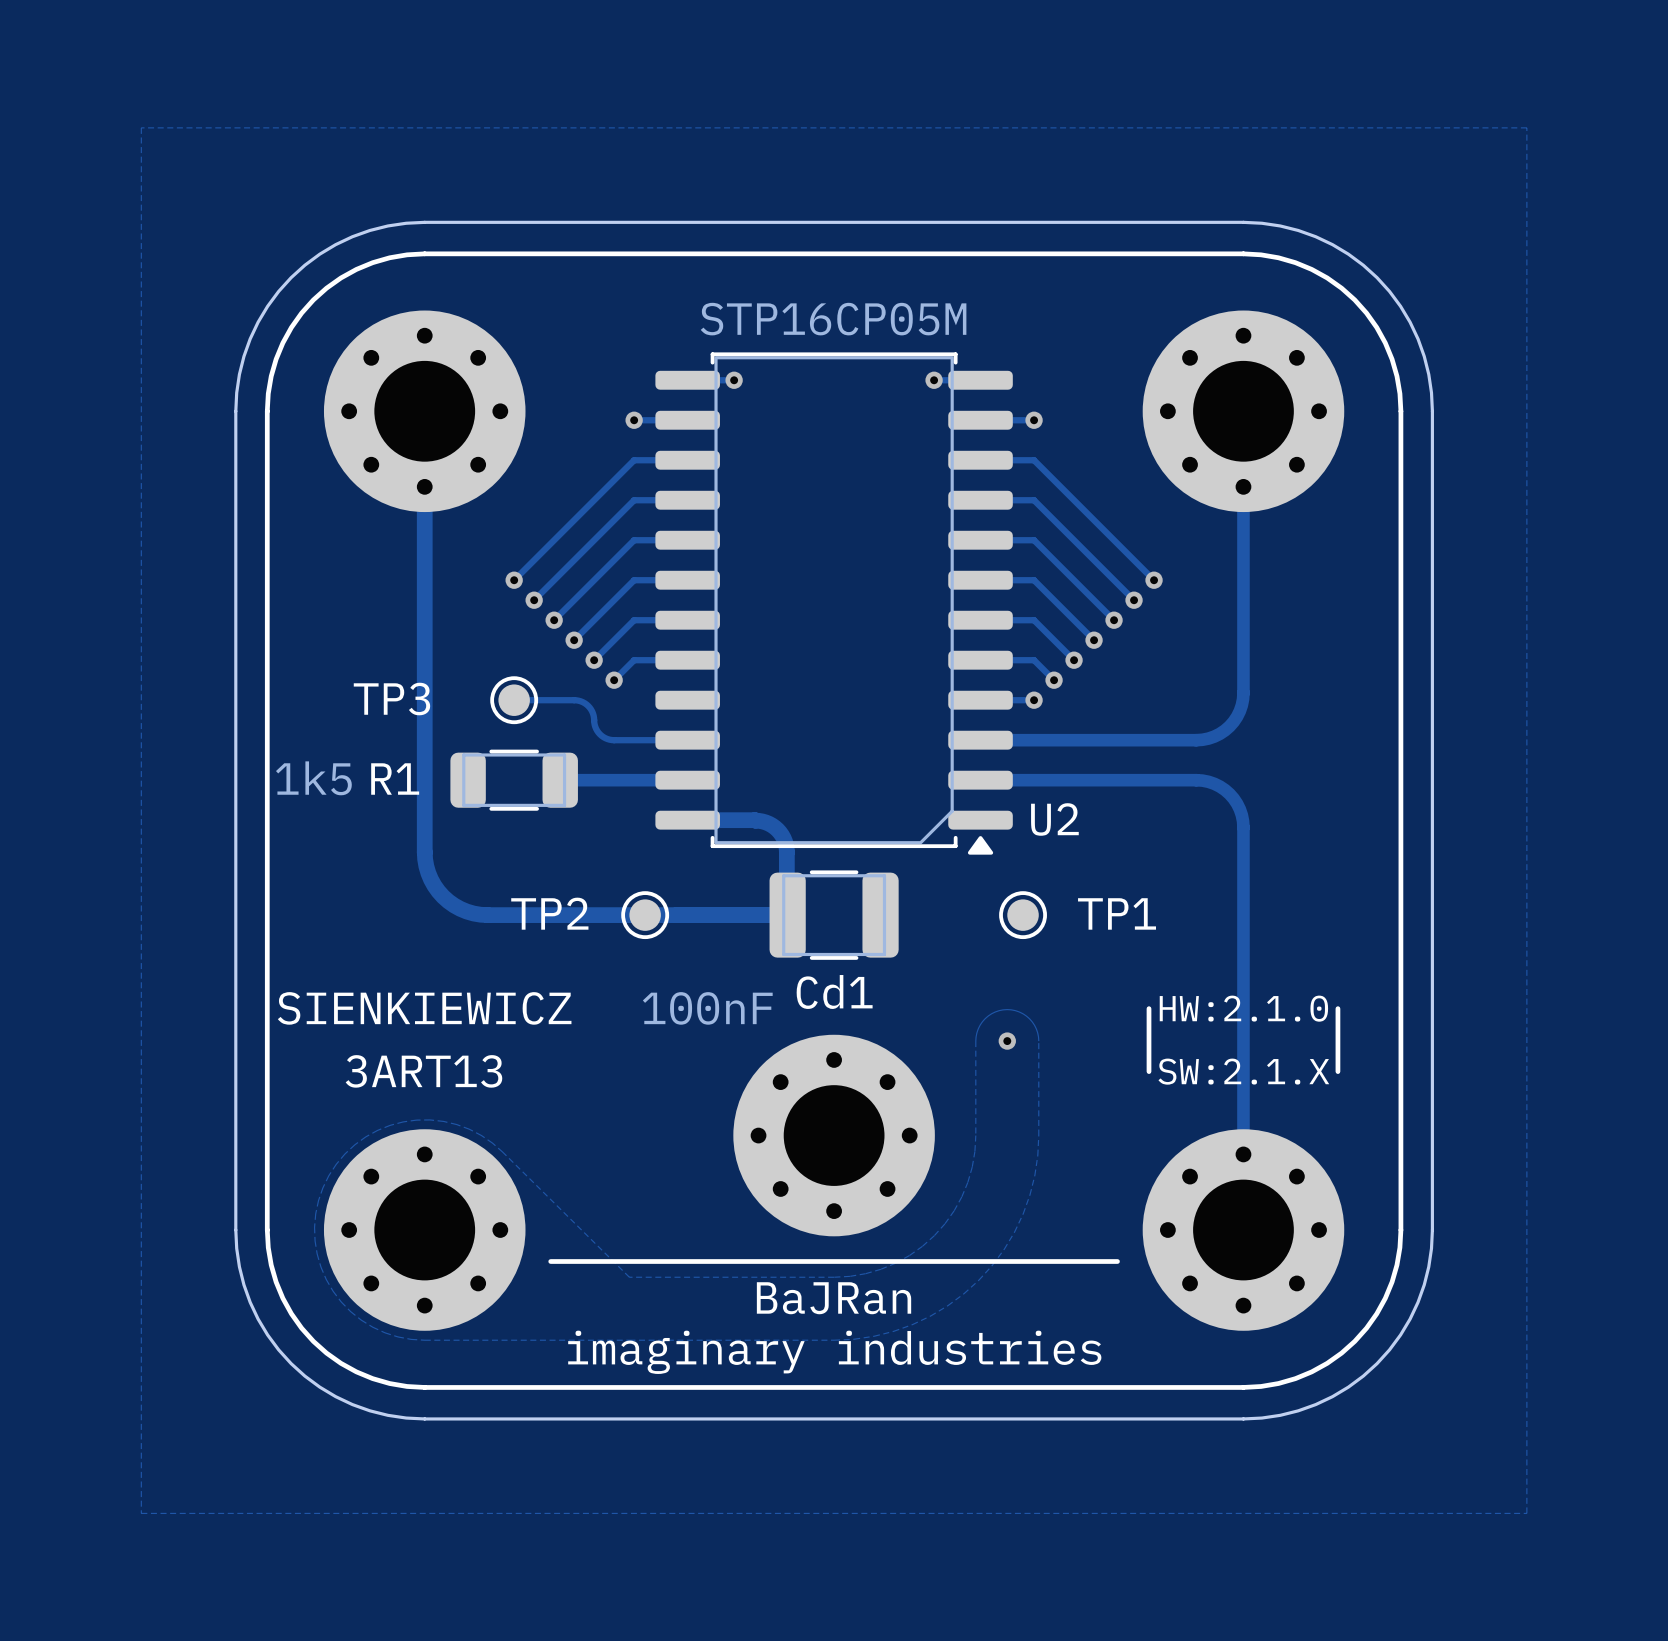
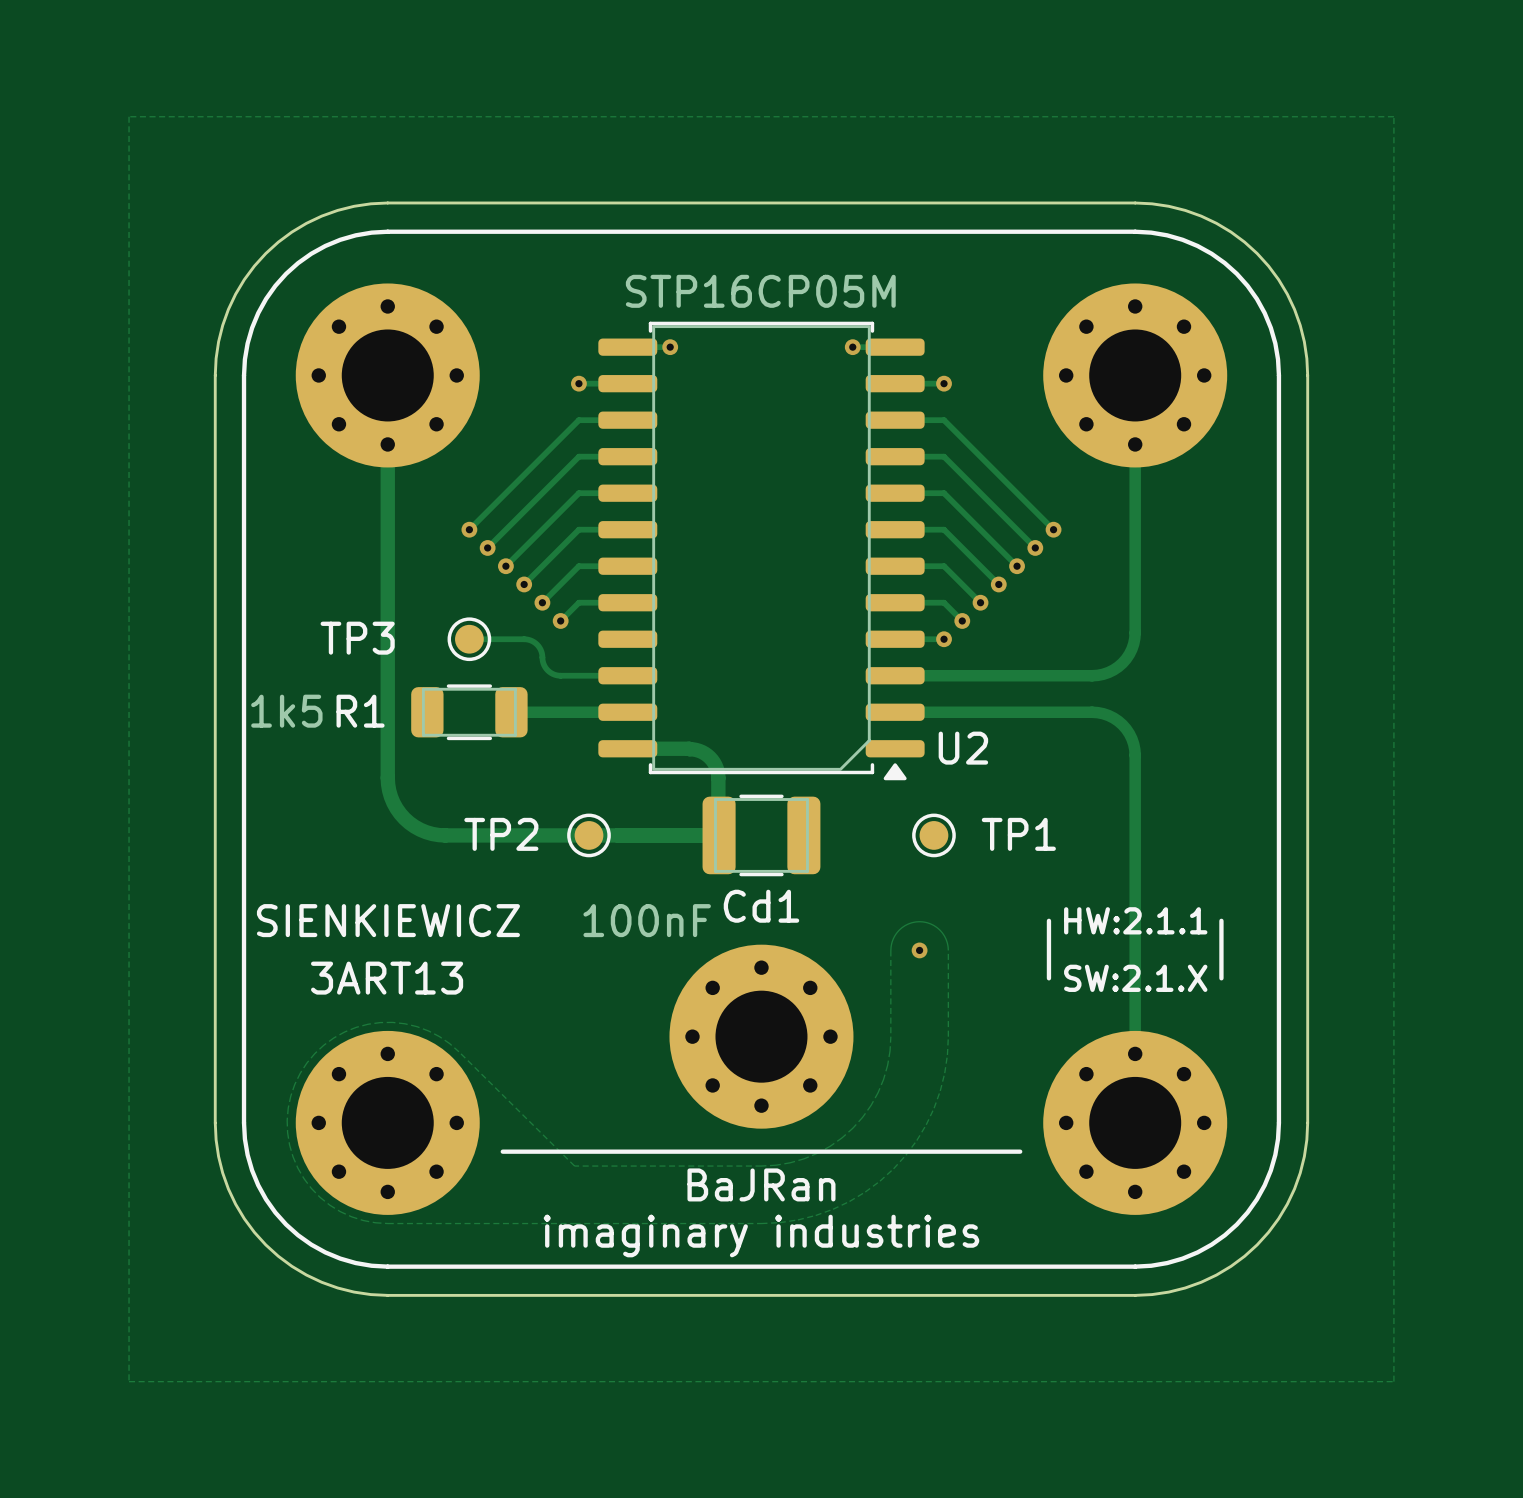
text: HW:2.1.0 (1243, 1008) -> HW:2.1.1 (1135, 920)

